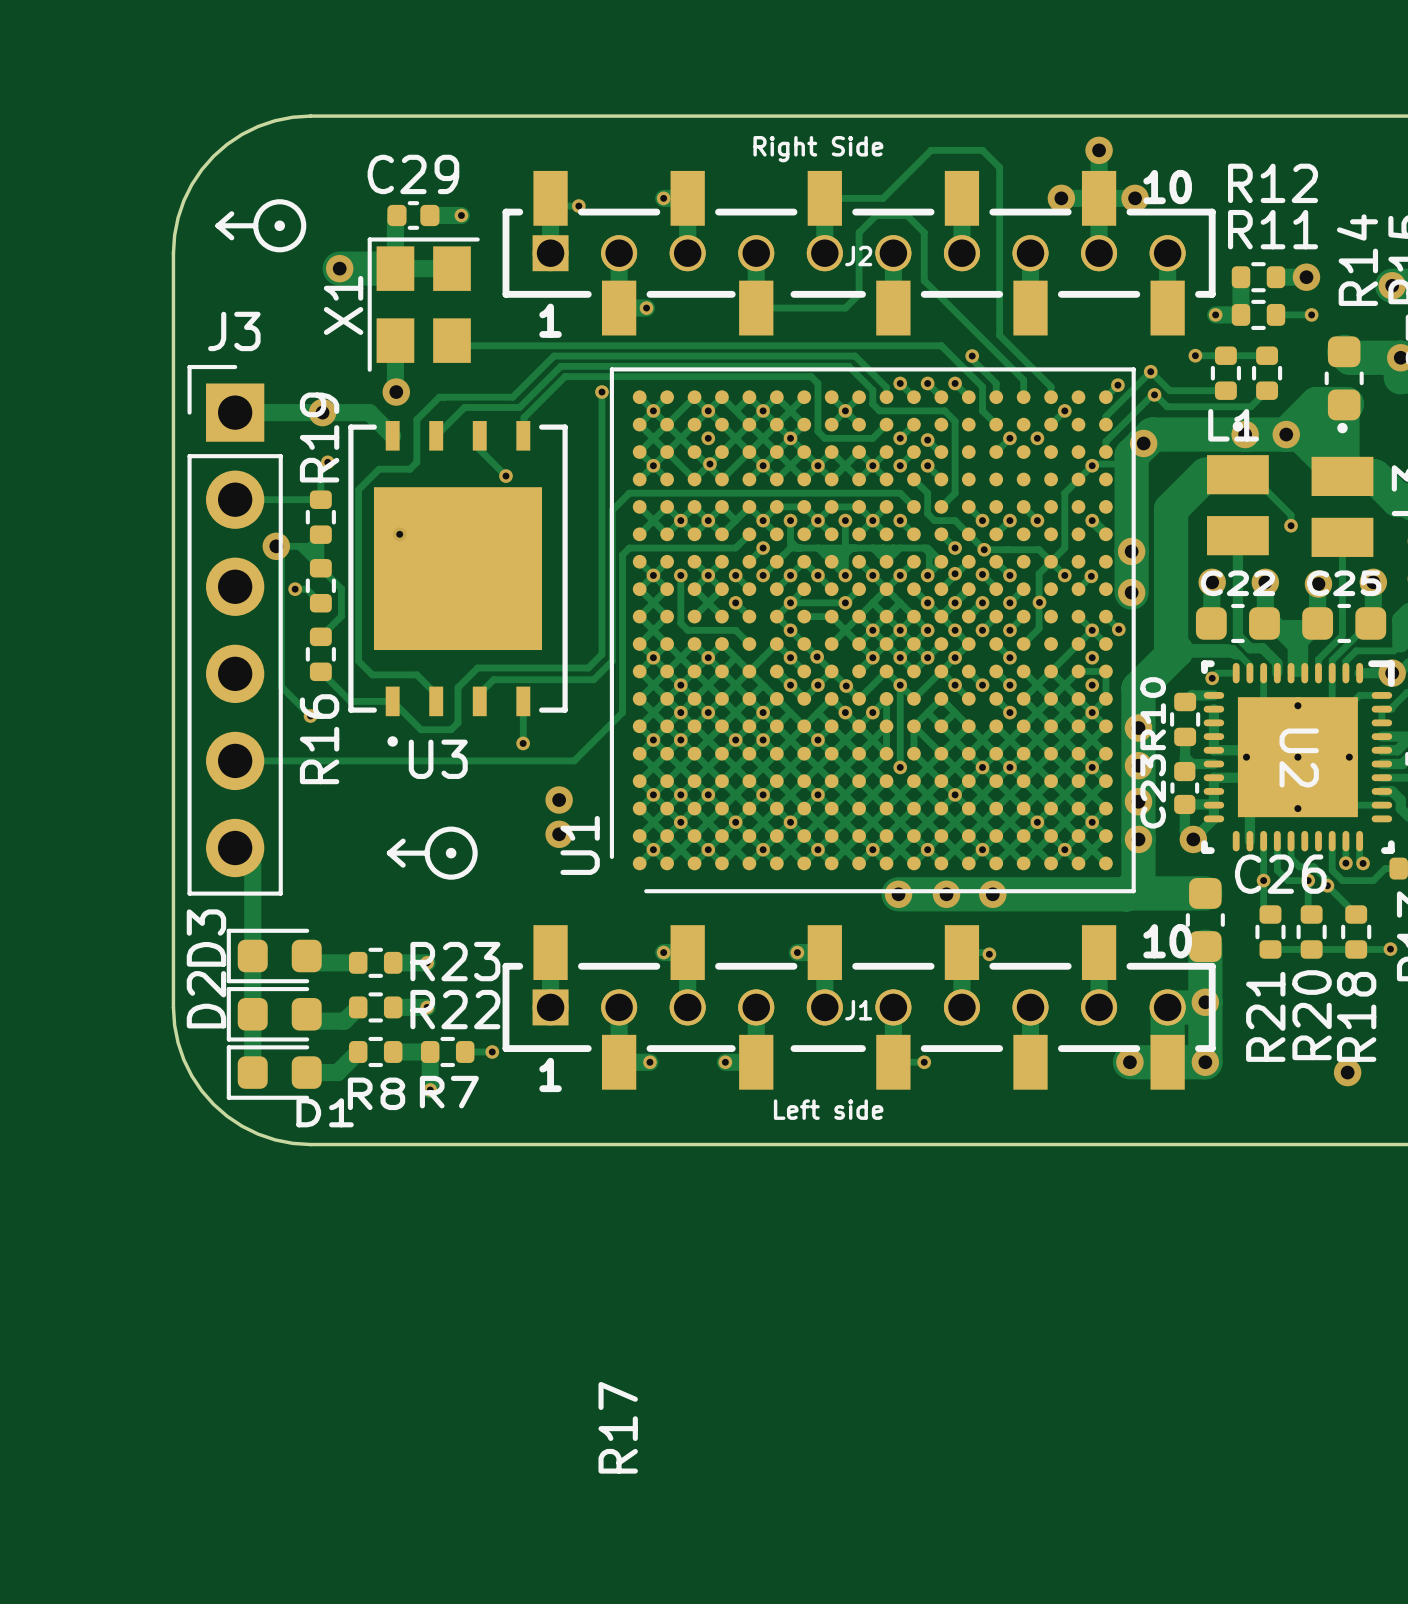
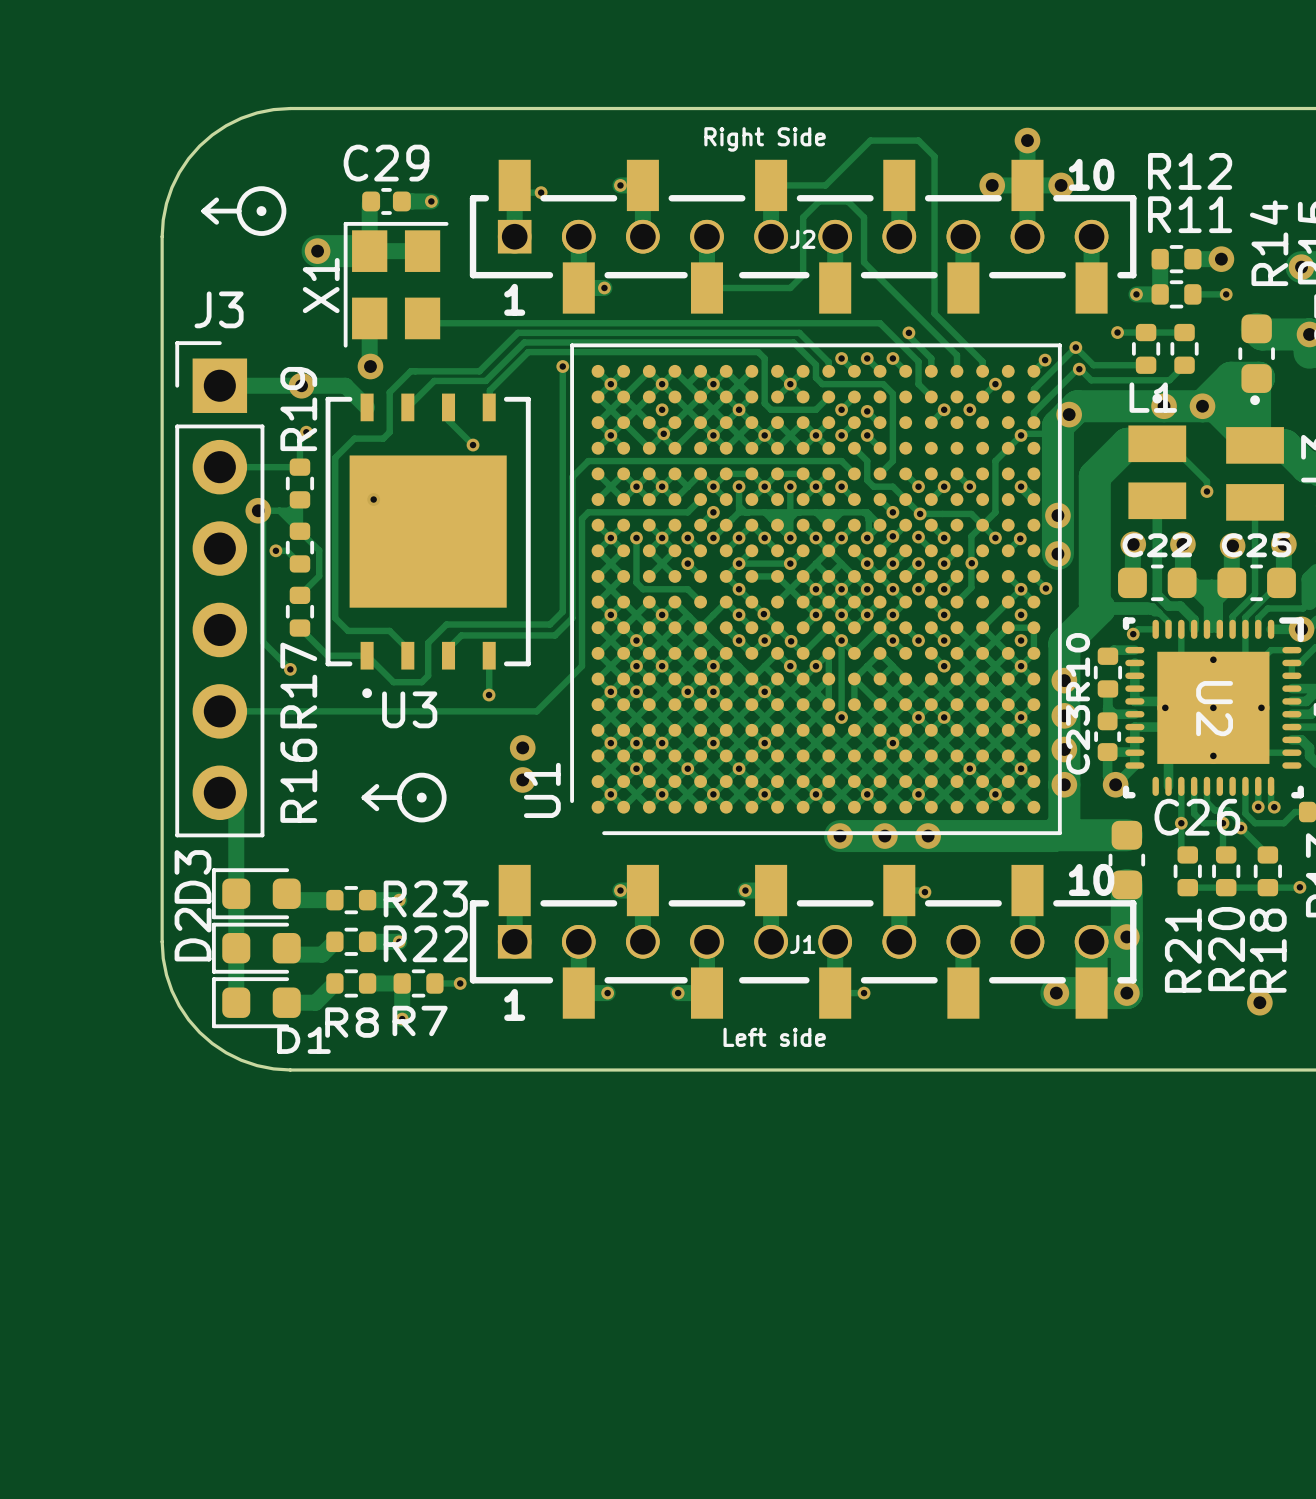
R16 name position: R16 (319, 739) -> R16 (298, 780)
R17 name position: R17 (618, 1427) -> R17 (298, 685)

